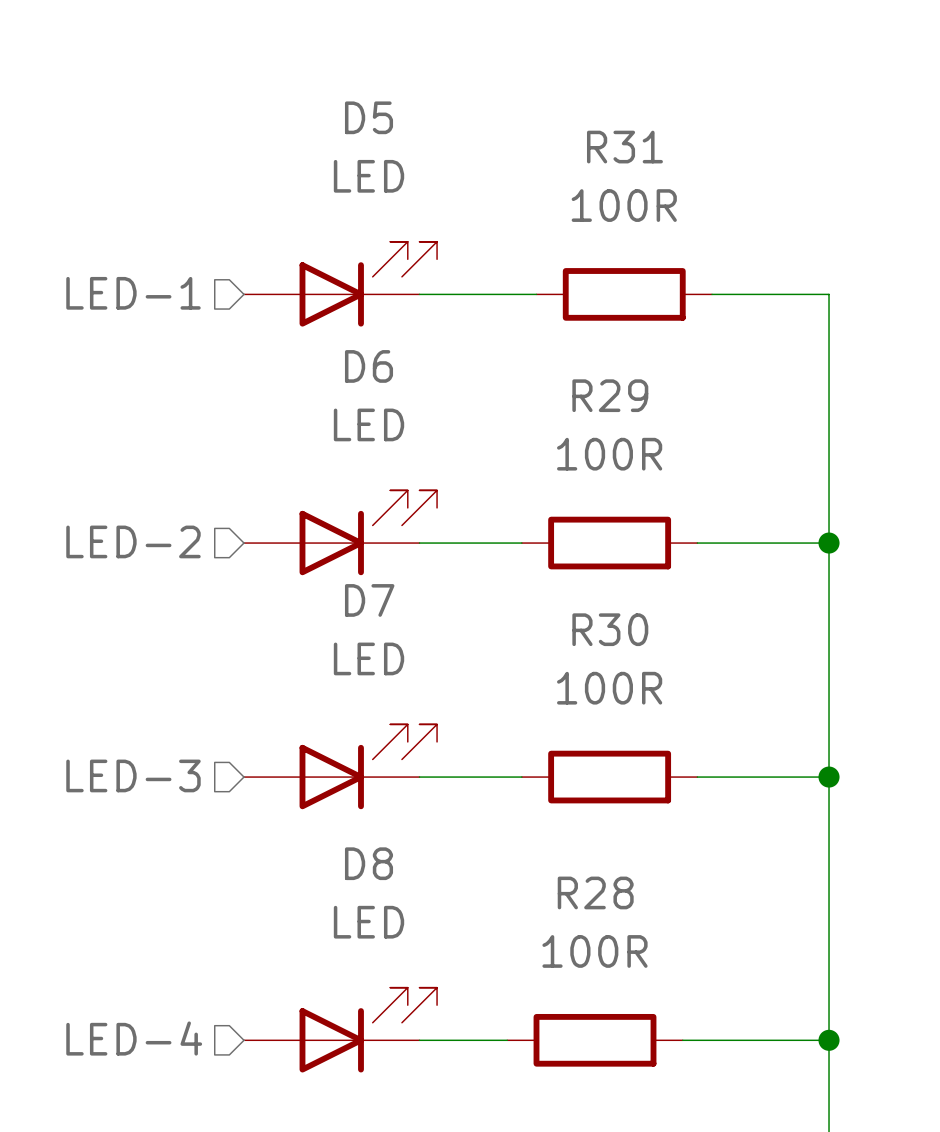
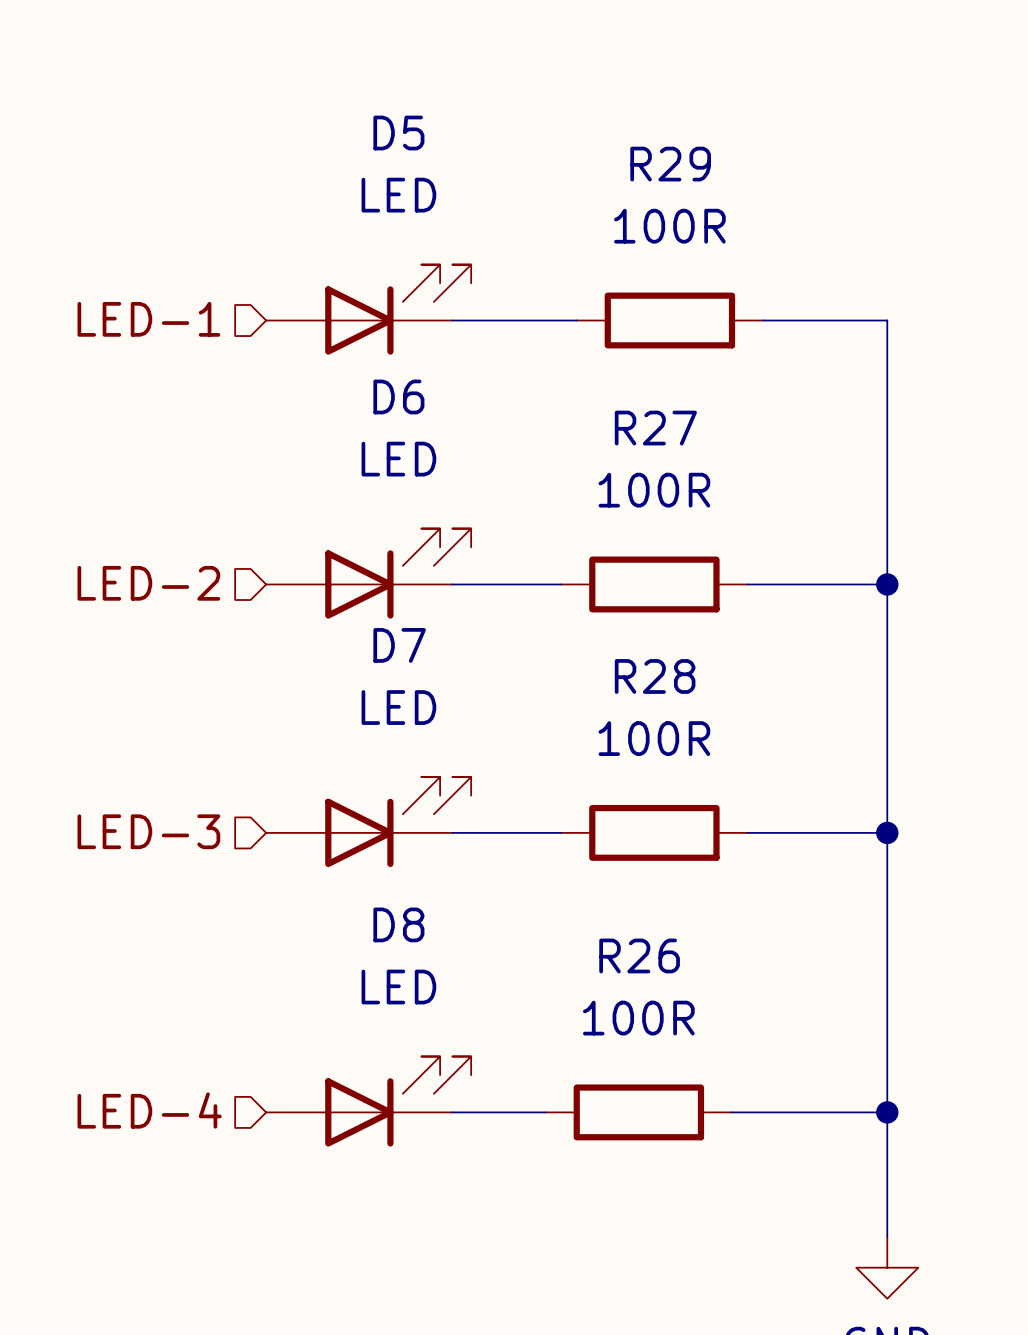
R31 name: R31 (624, 147) -> R29 (670, 164)
R29 name: R29 (610, 395) -> R27 (655, 428)
R30 name: R30 (610, 629) -> R28 (655, 676)
R28 name: R28 (595, 892) -> R26 (639, 955)

